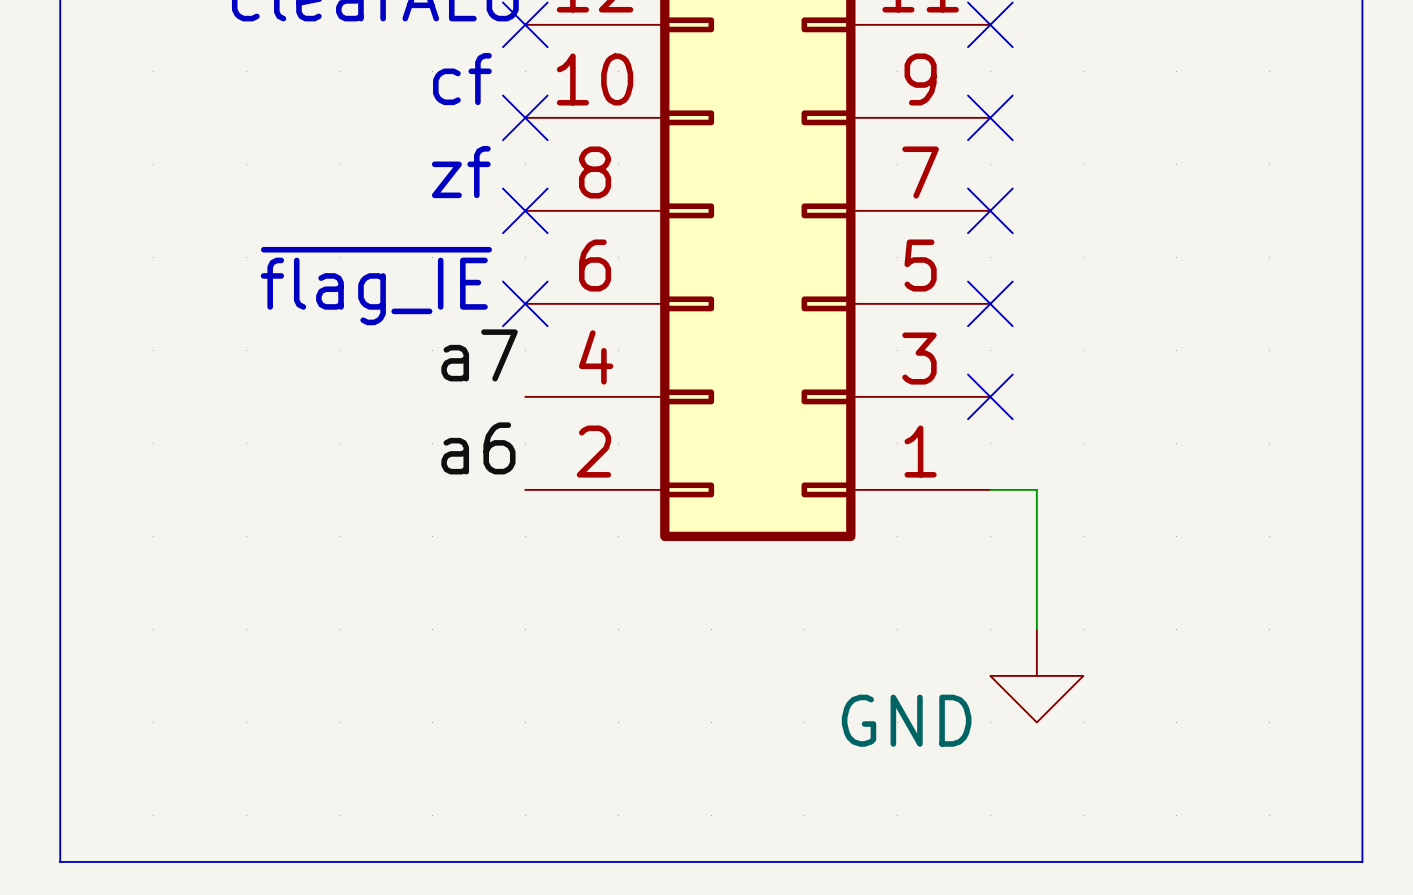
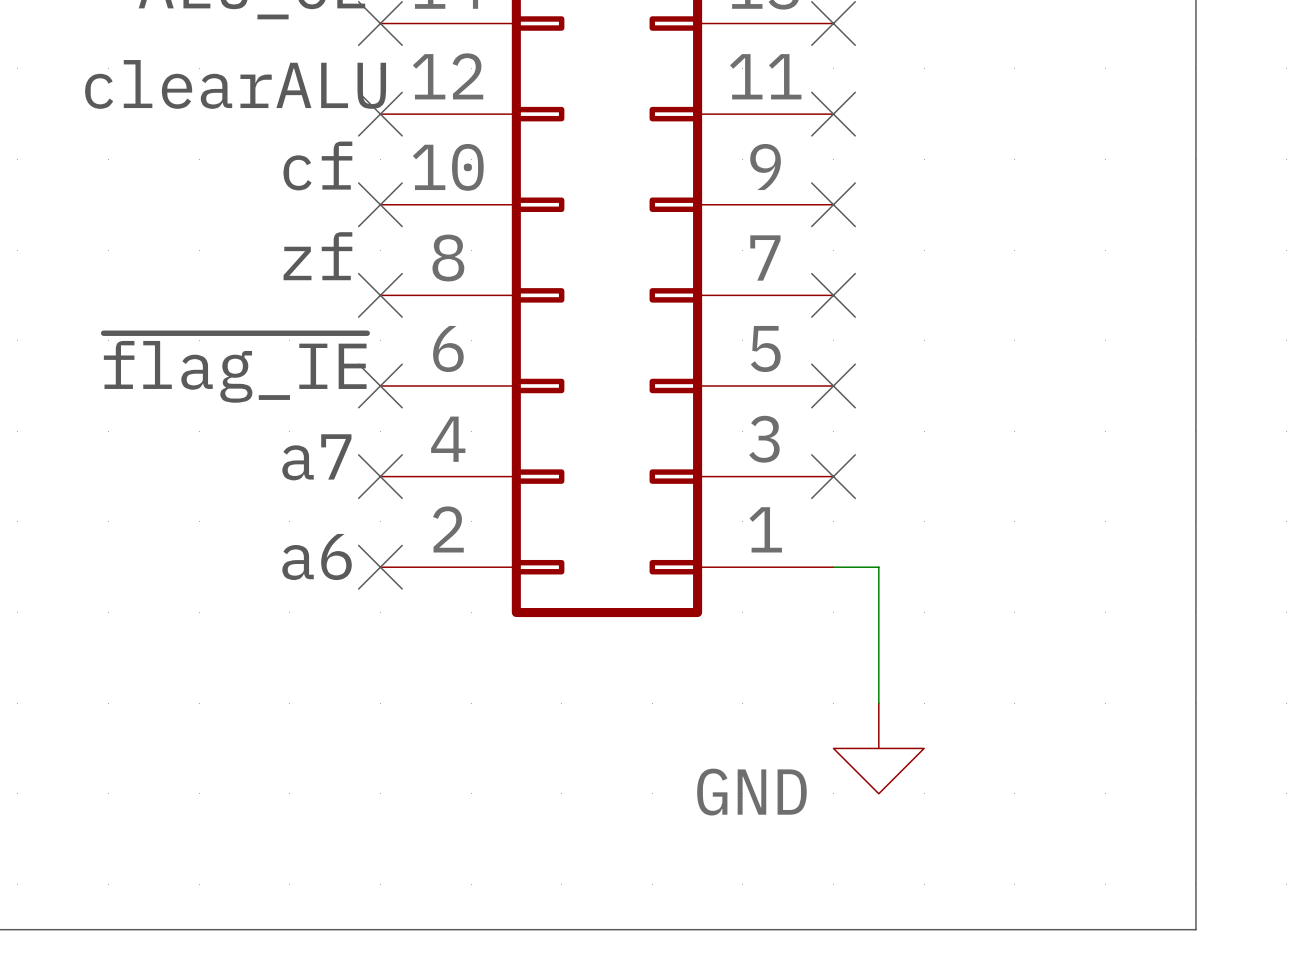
label: a7 (479, 355) -> none
text: none -> a7 (316, 457)
no-connect mark: none -> (380, 476)
label: a6 (478, 448) -> none
text: none -> a6 (317, 556)
no-connect mark: none -> (380, 567)

